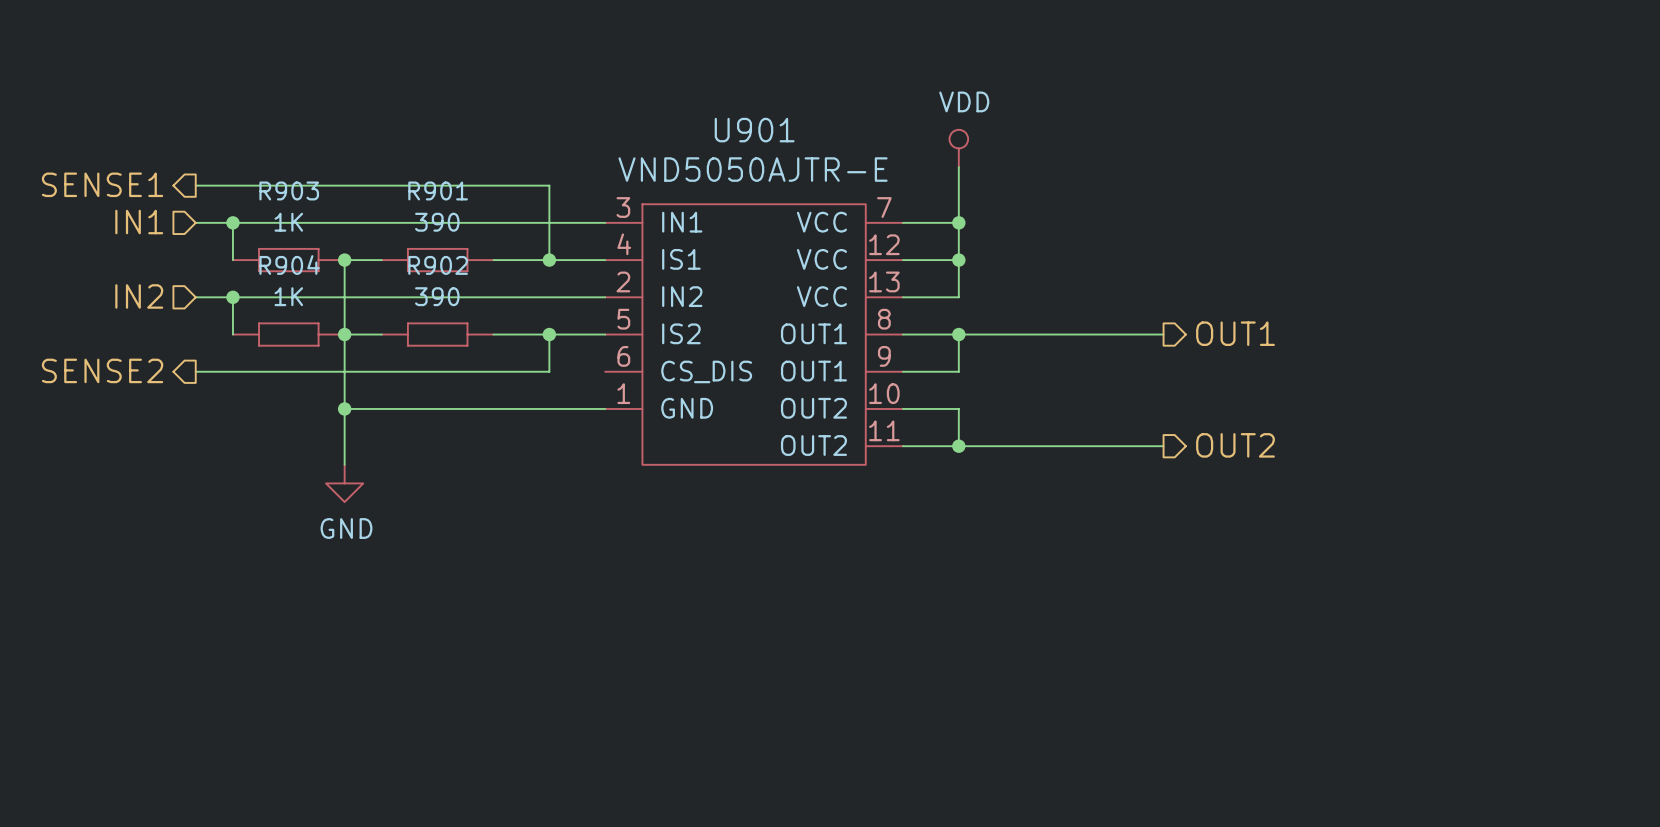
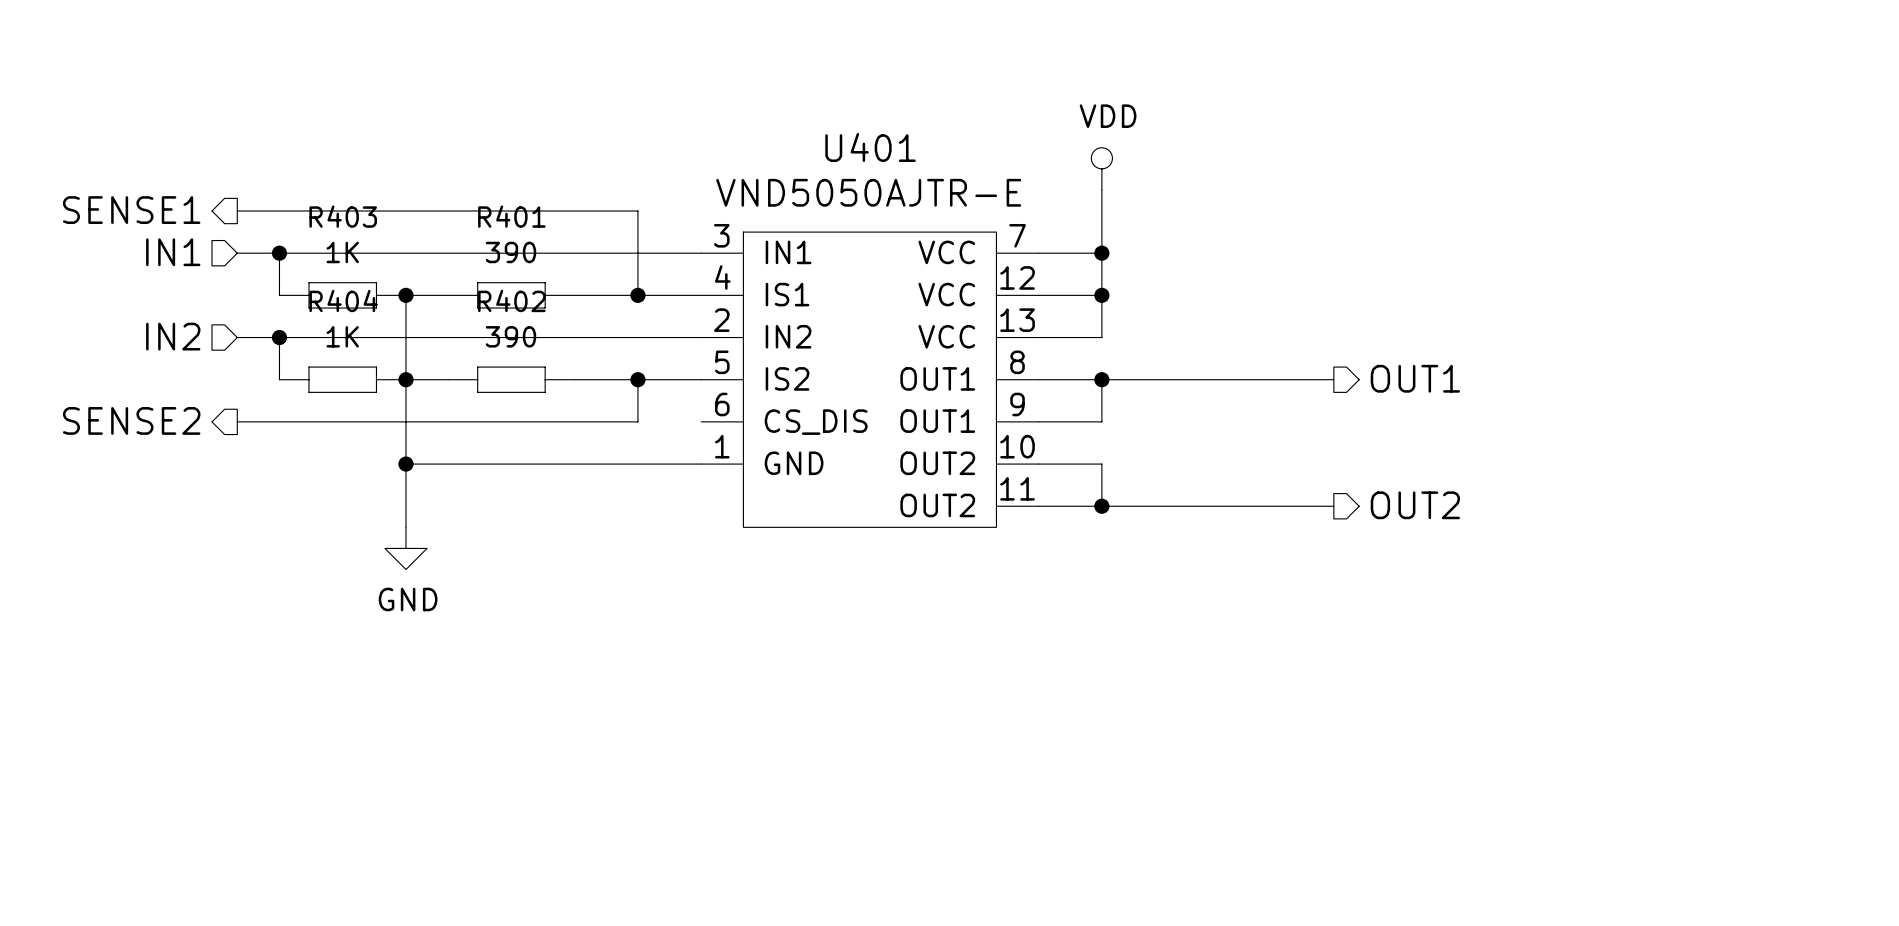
U901 name: U901 (754, 130) -> U401 (870, 147)
R903 name: R903 (289, 190) -> R403 (343, 216)
R901 name: R901 (438, 190) -> R401 (511, 216)
R904 name: R904 (289, 265) -> R404 (343, 300)
R902 name: R902 (438, 265) -> R402 (511, 300)

